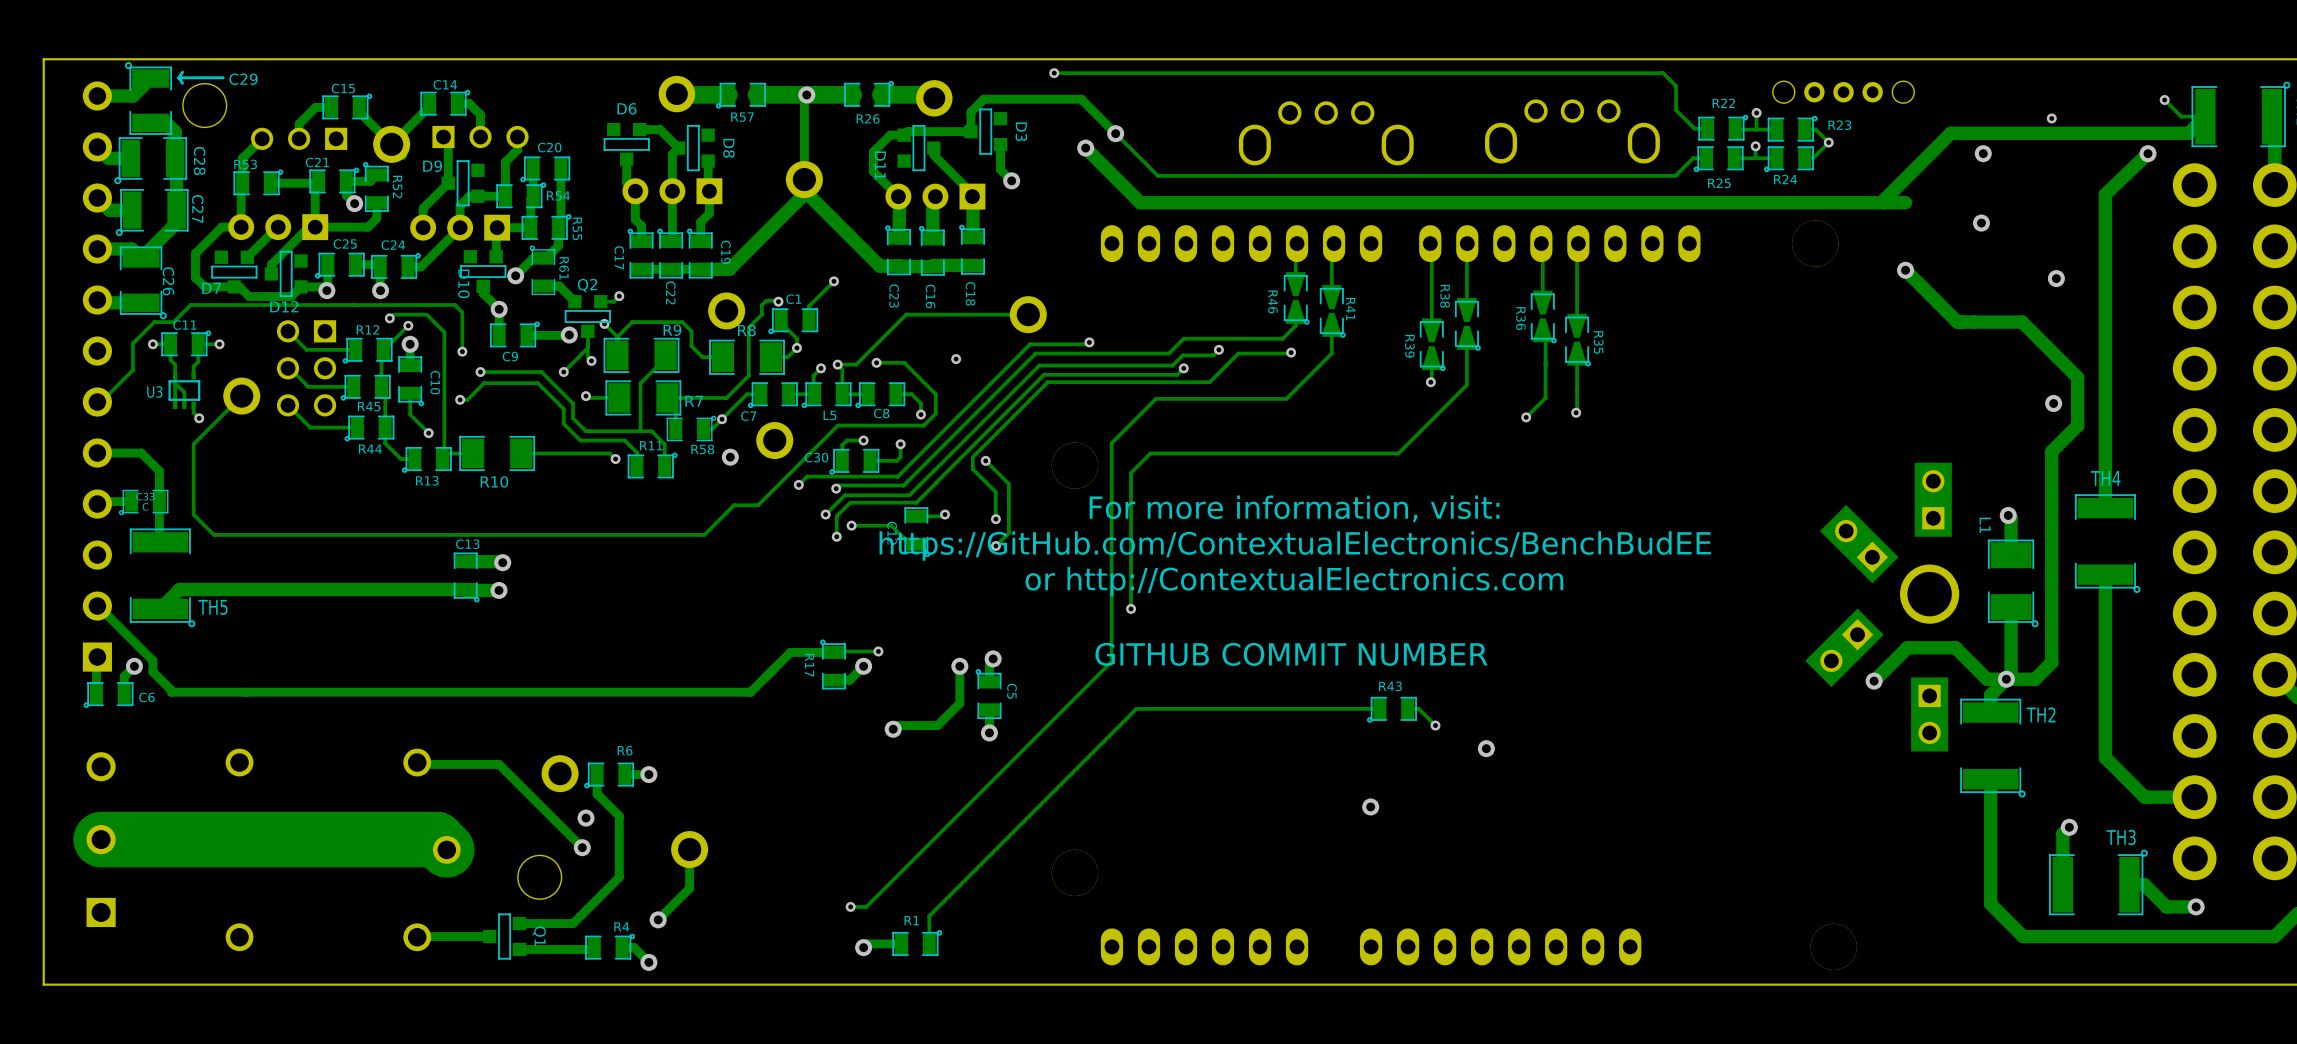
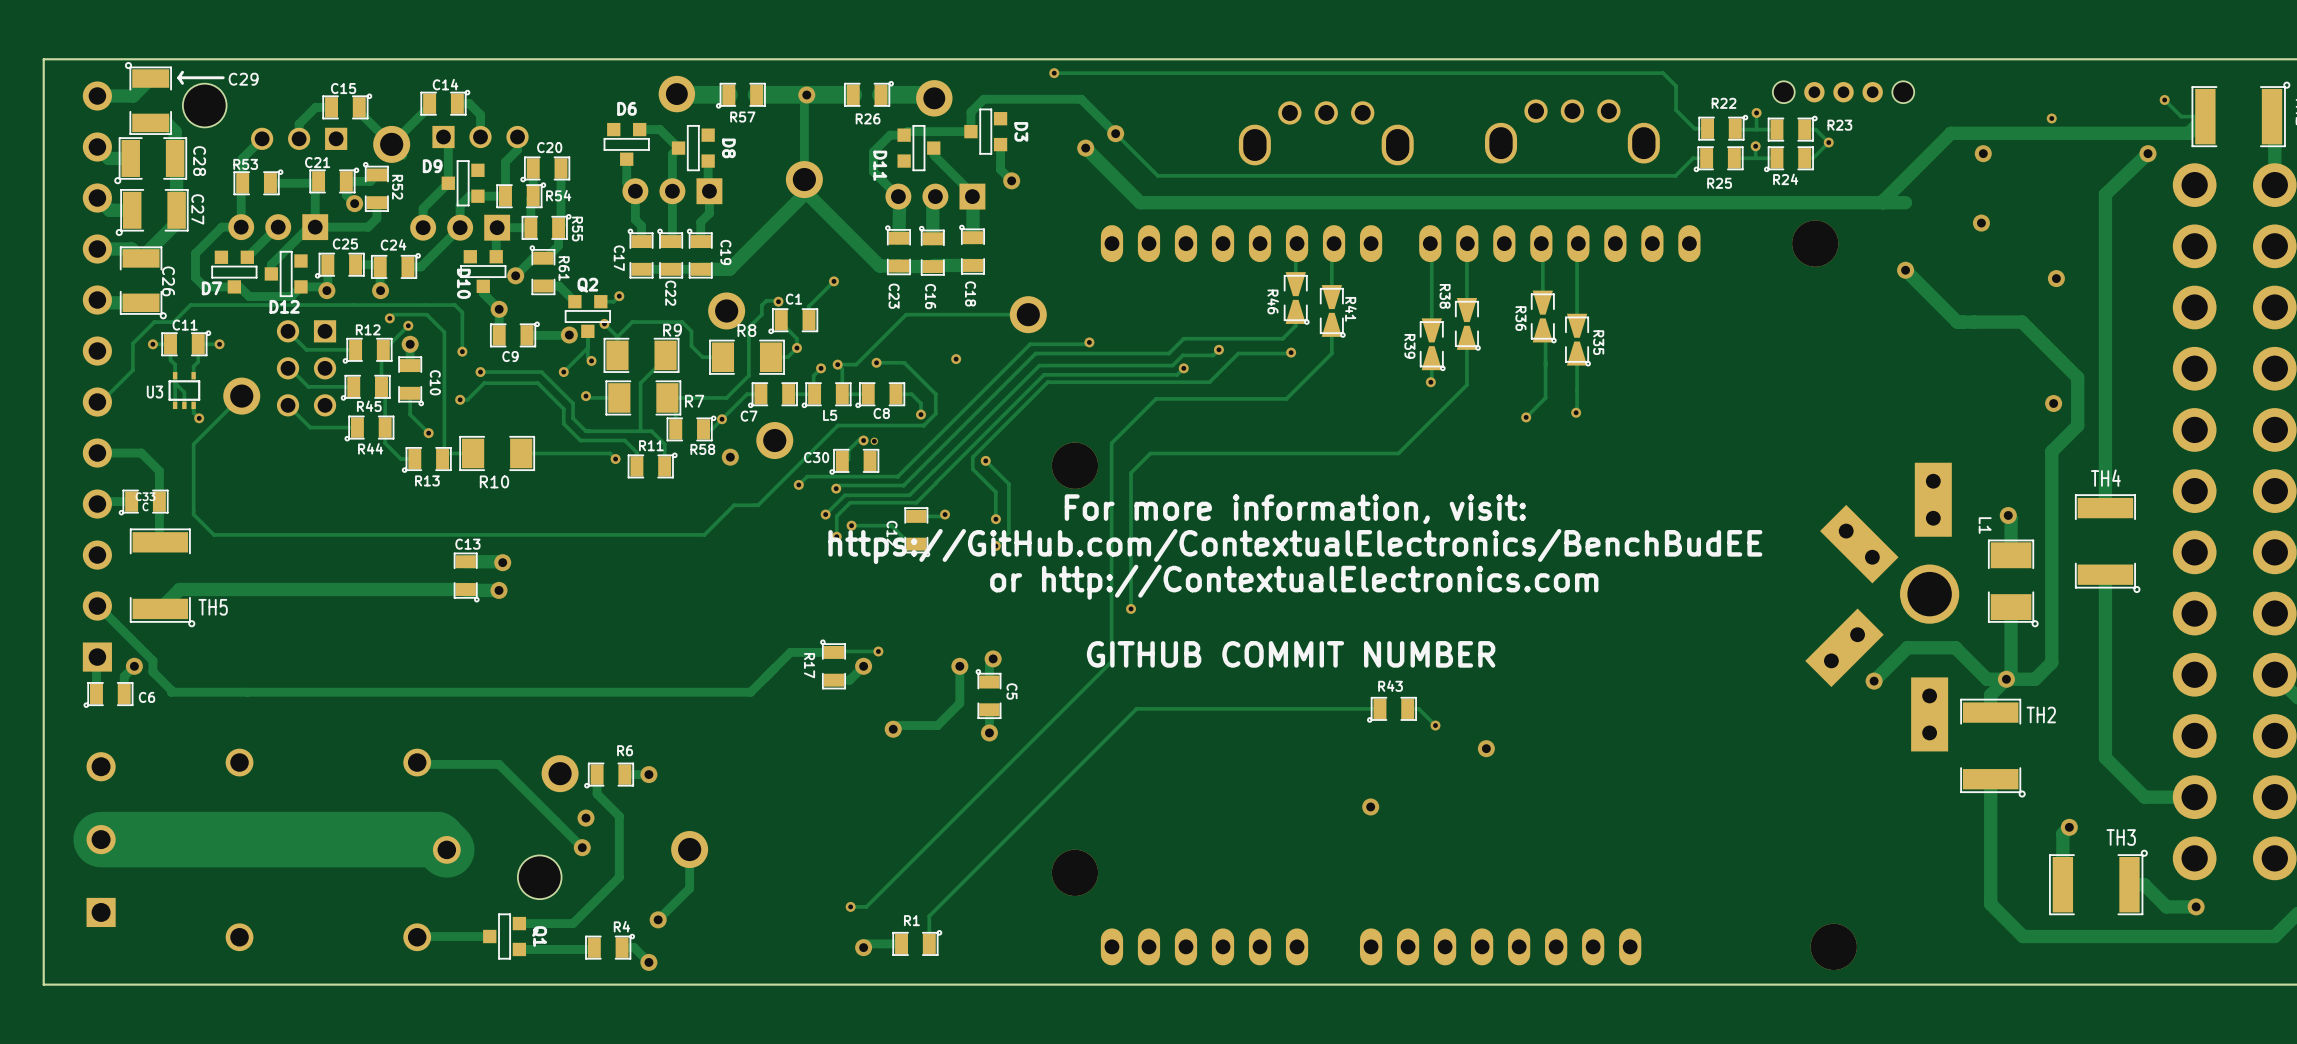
track: none -> (860, 438) (848, 450) (848, 459)
track: (863, 440) (846, 440) (842, 445) (842, 460) -> none
via: none -> (874, 441)
track: (900, 444) (900, 457) (896, 460) (870, 460) -> none
via: (900, 444) -> none

